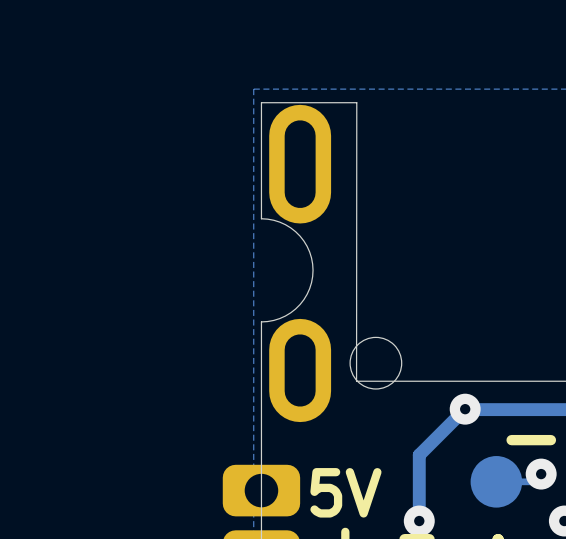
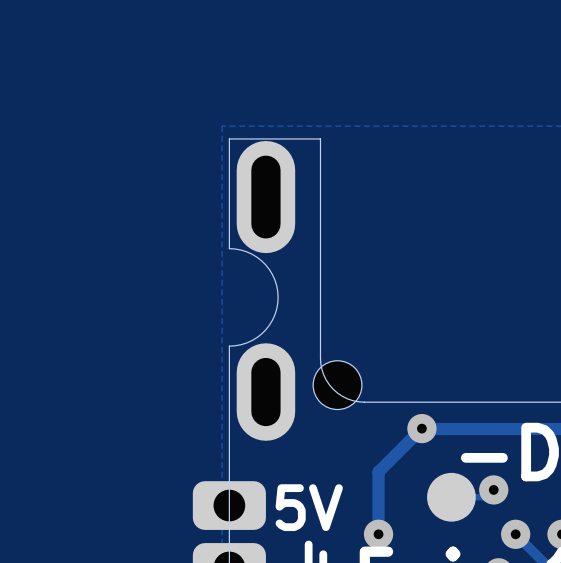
board edge: (356, 102) (356, 381) (404, 381) -> (319, 138) (320, 364) (326, 380) (333, 389) (347, 398) (364, 402)

